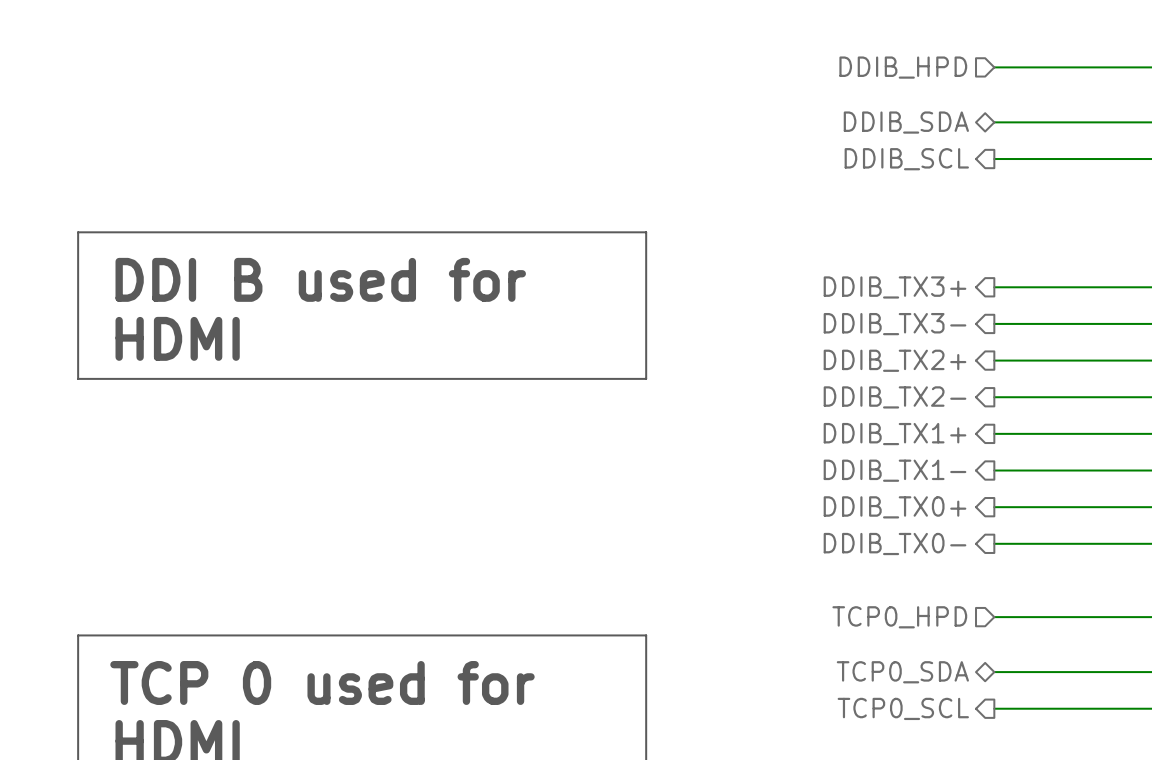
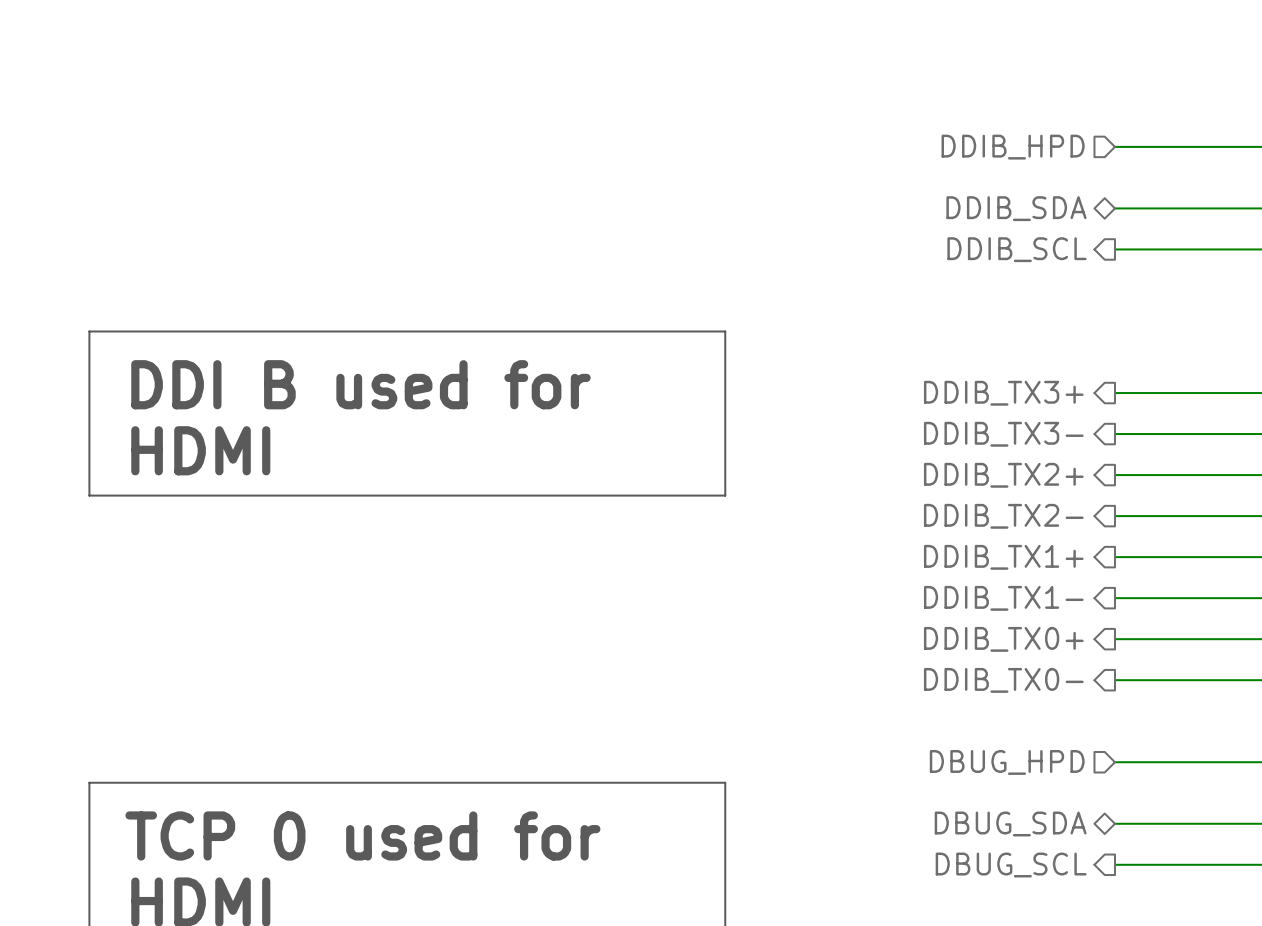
hierarchical label: TCP0_HPD (899, 617) -> DBUG_HPD (1007, 762)
hierarchical label: TCP0_SDA (902, 672) -> DBUG_SDA (1010, 823)
hierarchical label: TCP0_SCL (903, 708) -> DBUG_SCL (1011, 865)

